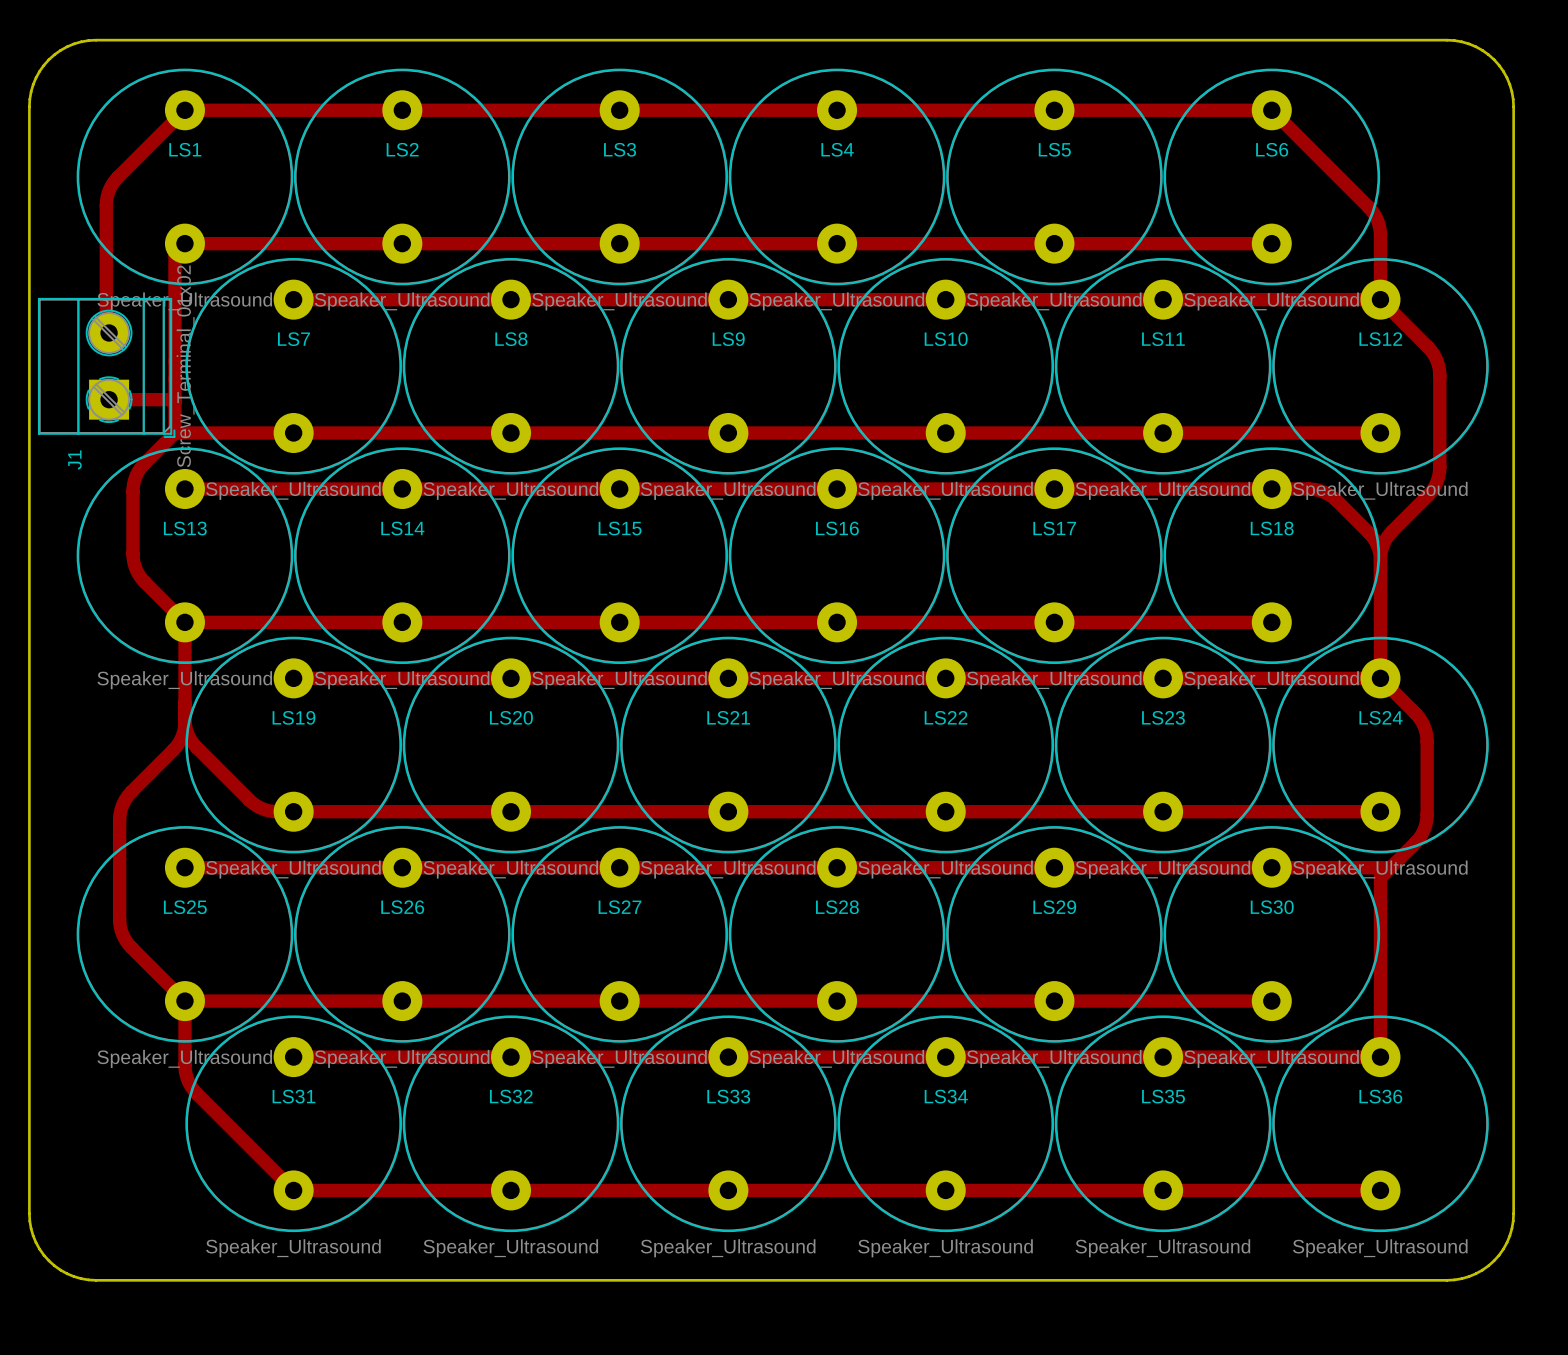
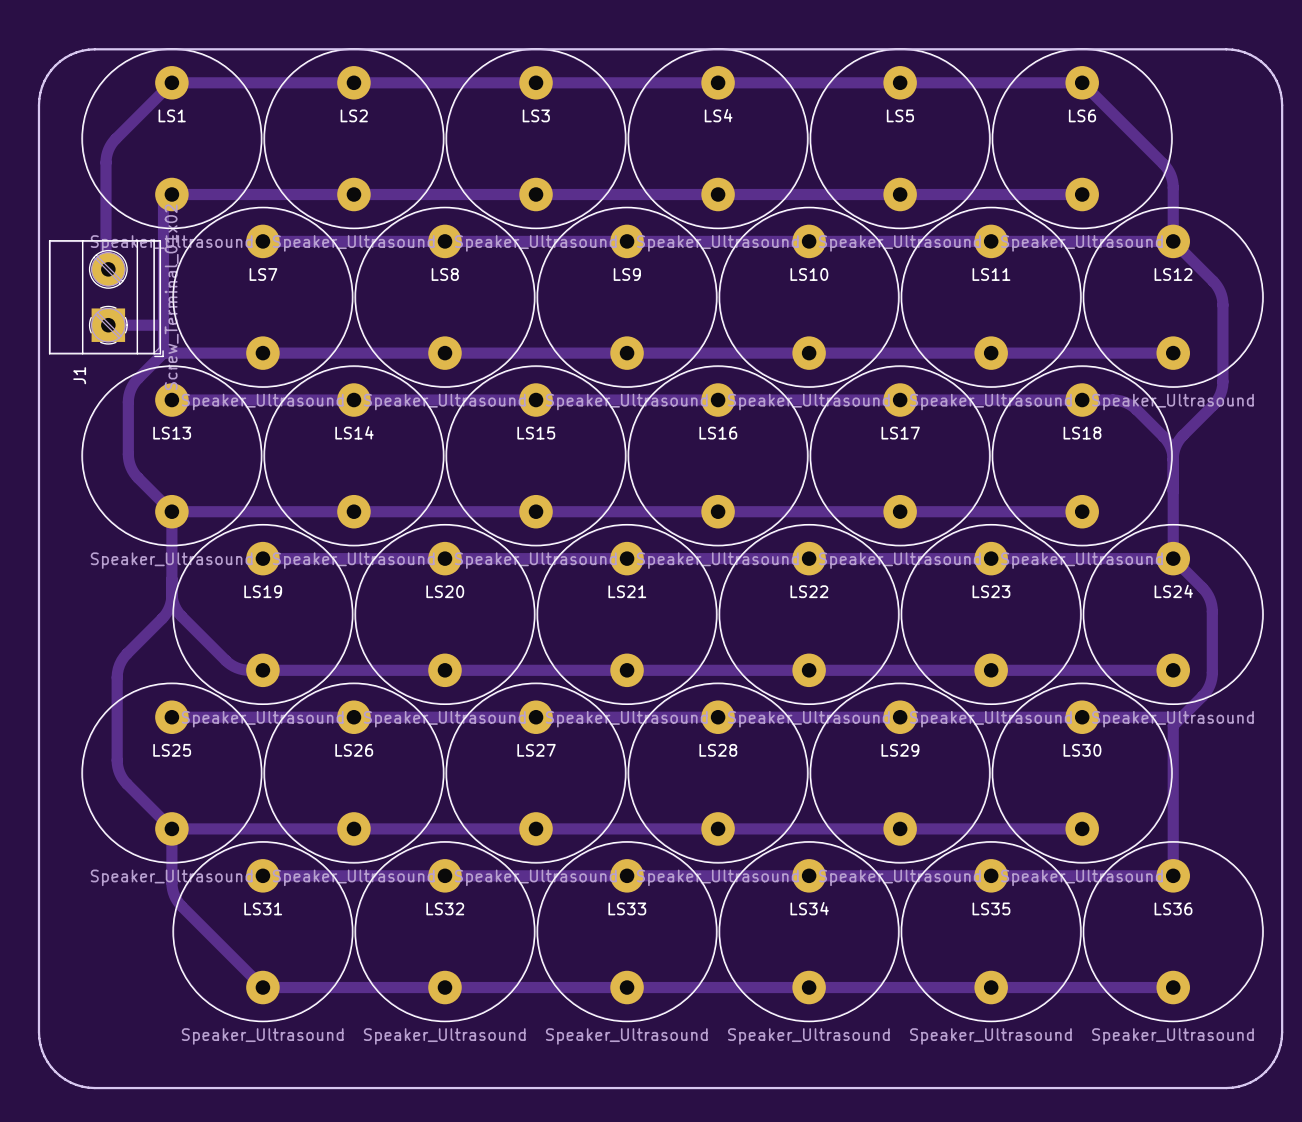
board edge: (96, 40) (1446, 40) (1468, 43) (1488, 54) (1499, 65) (1507, 77) (1511, 91) (1513, 106) (1513, 1213) (1509, 1235) (1499, 1255) (1488, 1265) (1475, 1273) (1461, 1278) (1446, 1280) (96, 1280) (74, 1276) (54, 1265) (43, 1255) (36, 1242) (31, 1228) (29, 1213) (29, 106) (33, 84) (39, 71) (48, 59) (67, 46) (81, 41) (96, 40) -> (94, 49) (1226, 49) (1244, 52) (1261, 61) (1276, 80) (1282, 105) (1282, 1032) (1279, 1050) (1269, 1067) (1250, 1082) (1226, 1088) (94, 1088) (76, 1084) (60, 1075) (44, 1056) (38, 1032) (38, 105) (42, 86) (55, 65) (76, 52) (94, 49)

